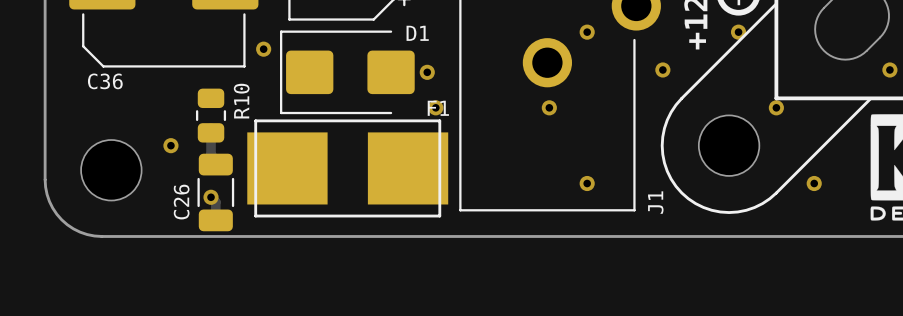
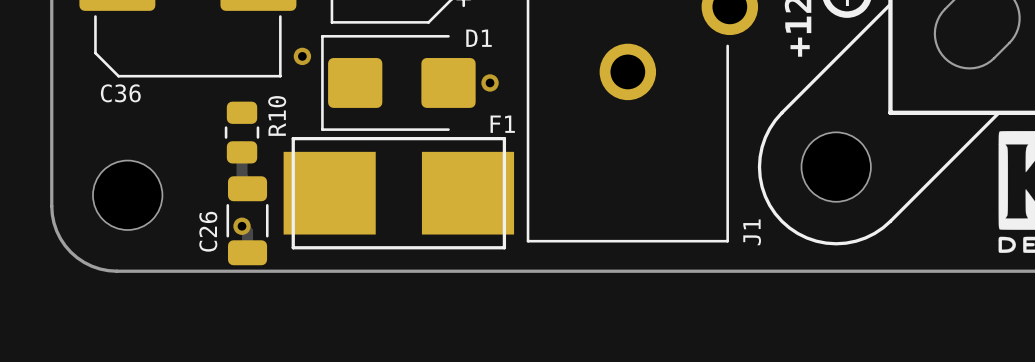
via: (587, 32) -> none
via: (738, 32) -> none
via: (662, 69) -> none
via: (889, 69) -> none
via: (435, 107) -> none
via: (549, 107) -> none
via: (776, 107) -> none
via: (170, 145) -> none
via: (587, 183) -> none
via: (814, 183) -> none

